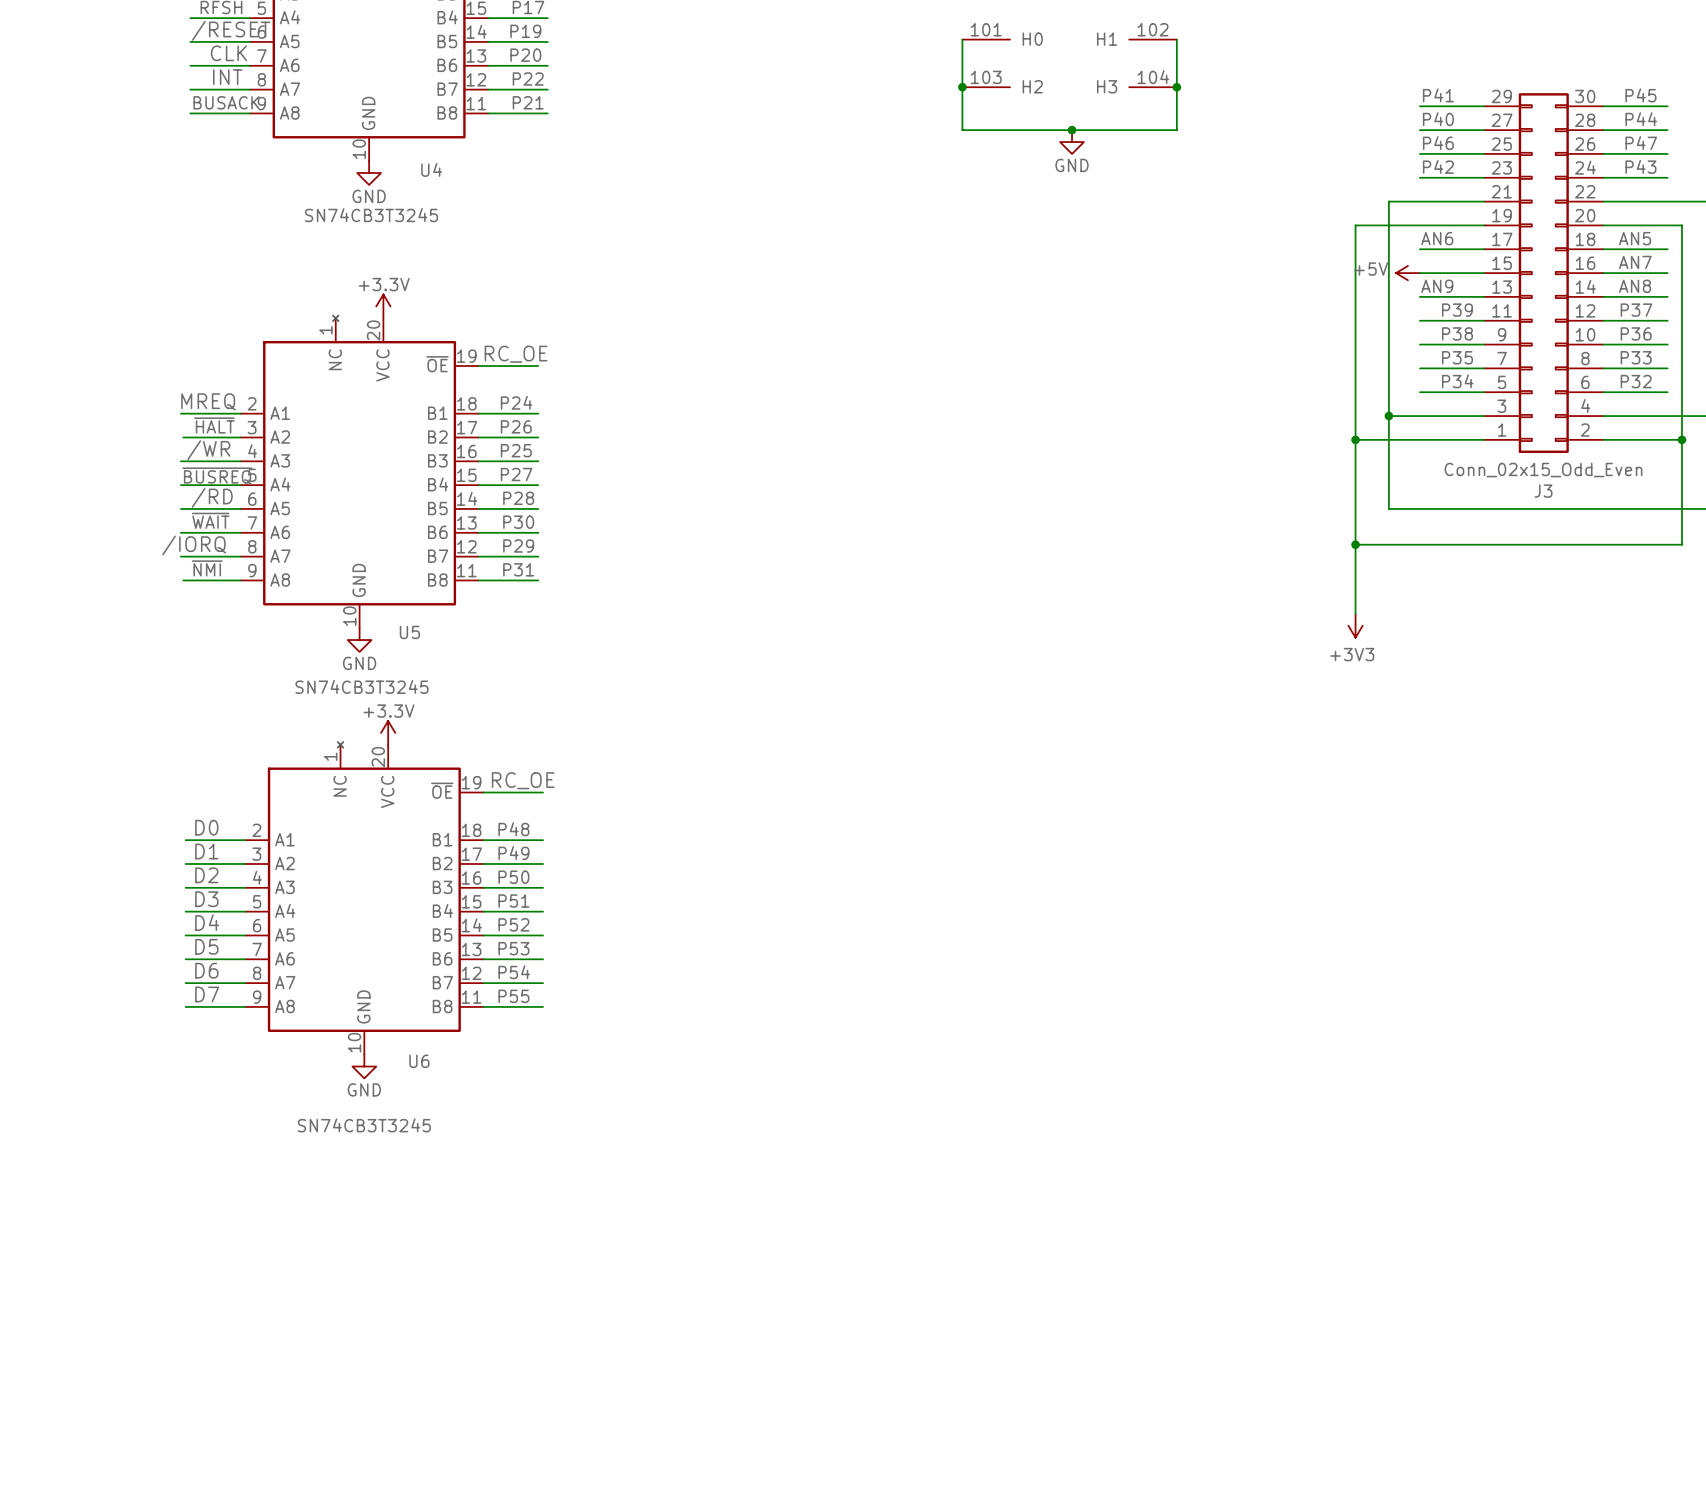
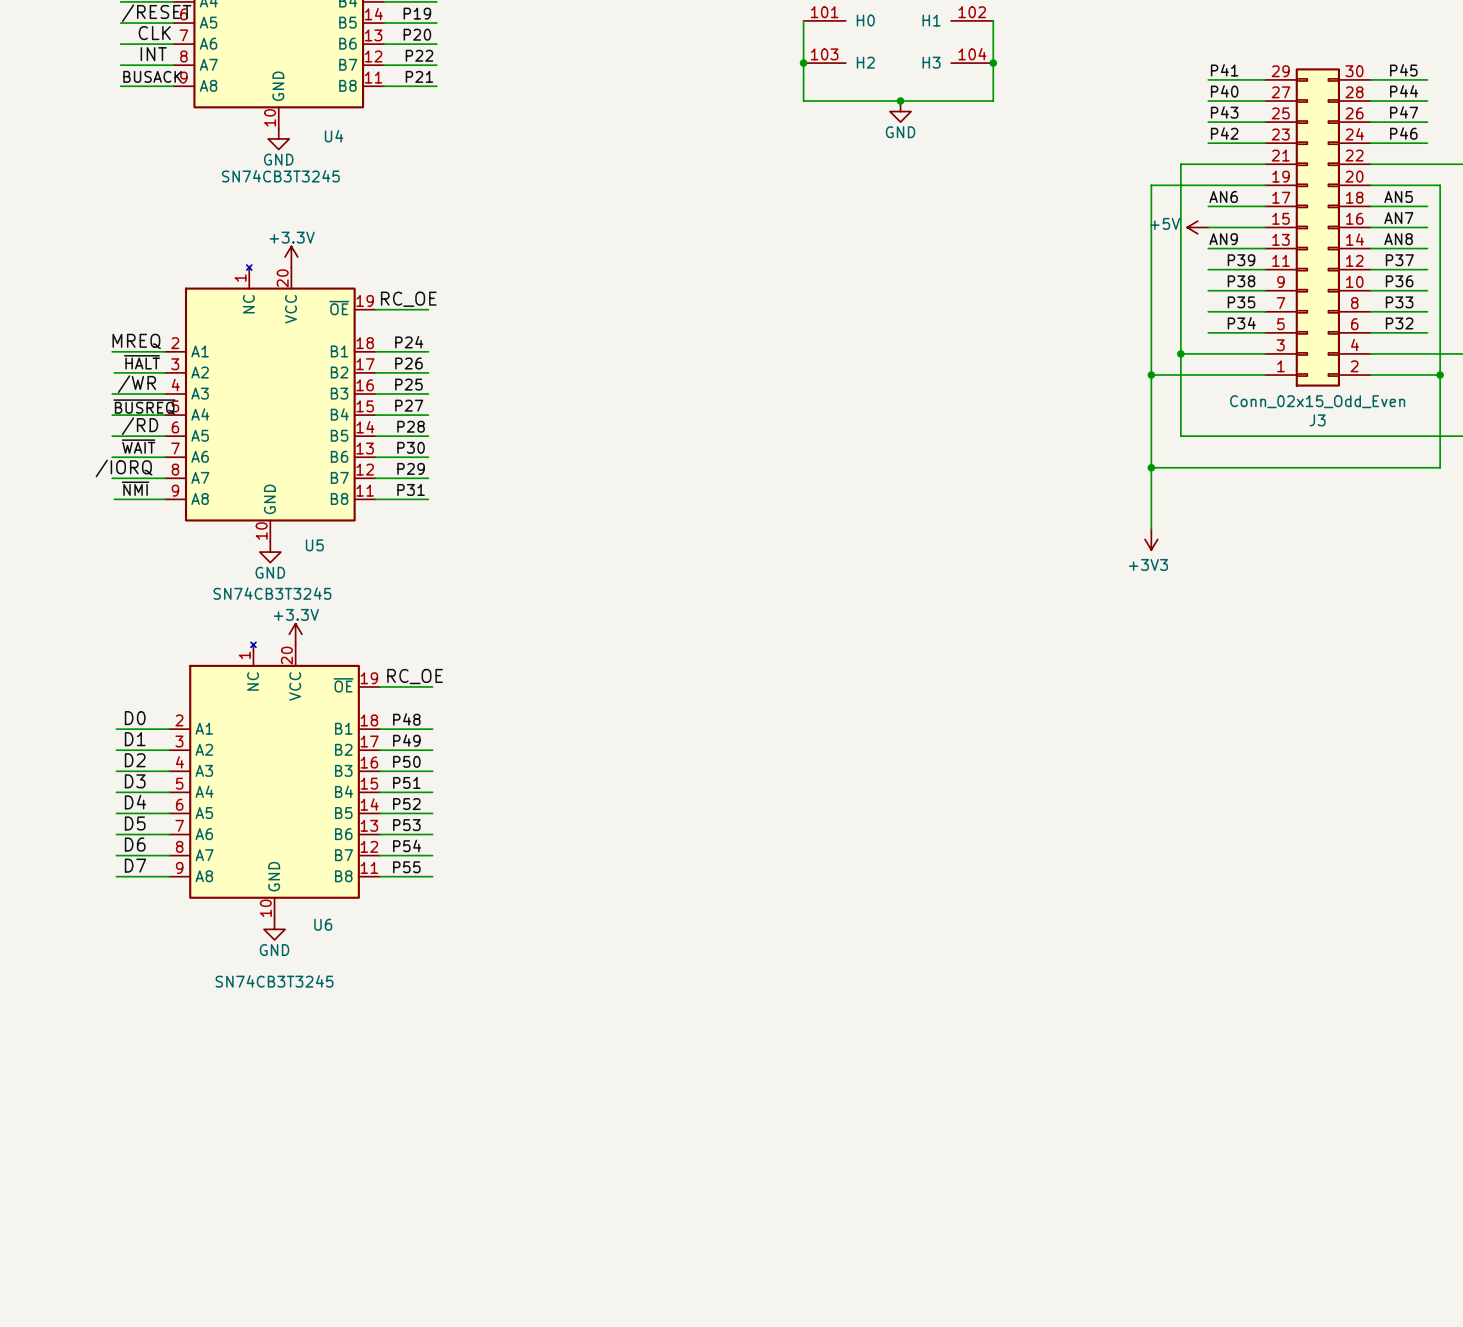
label: P46 (1438, 143) -> P43 (1224, 112)
label: P43 (1640, 166) -> P46 (1403, 133)

